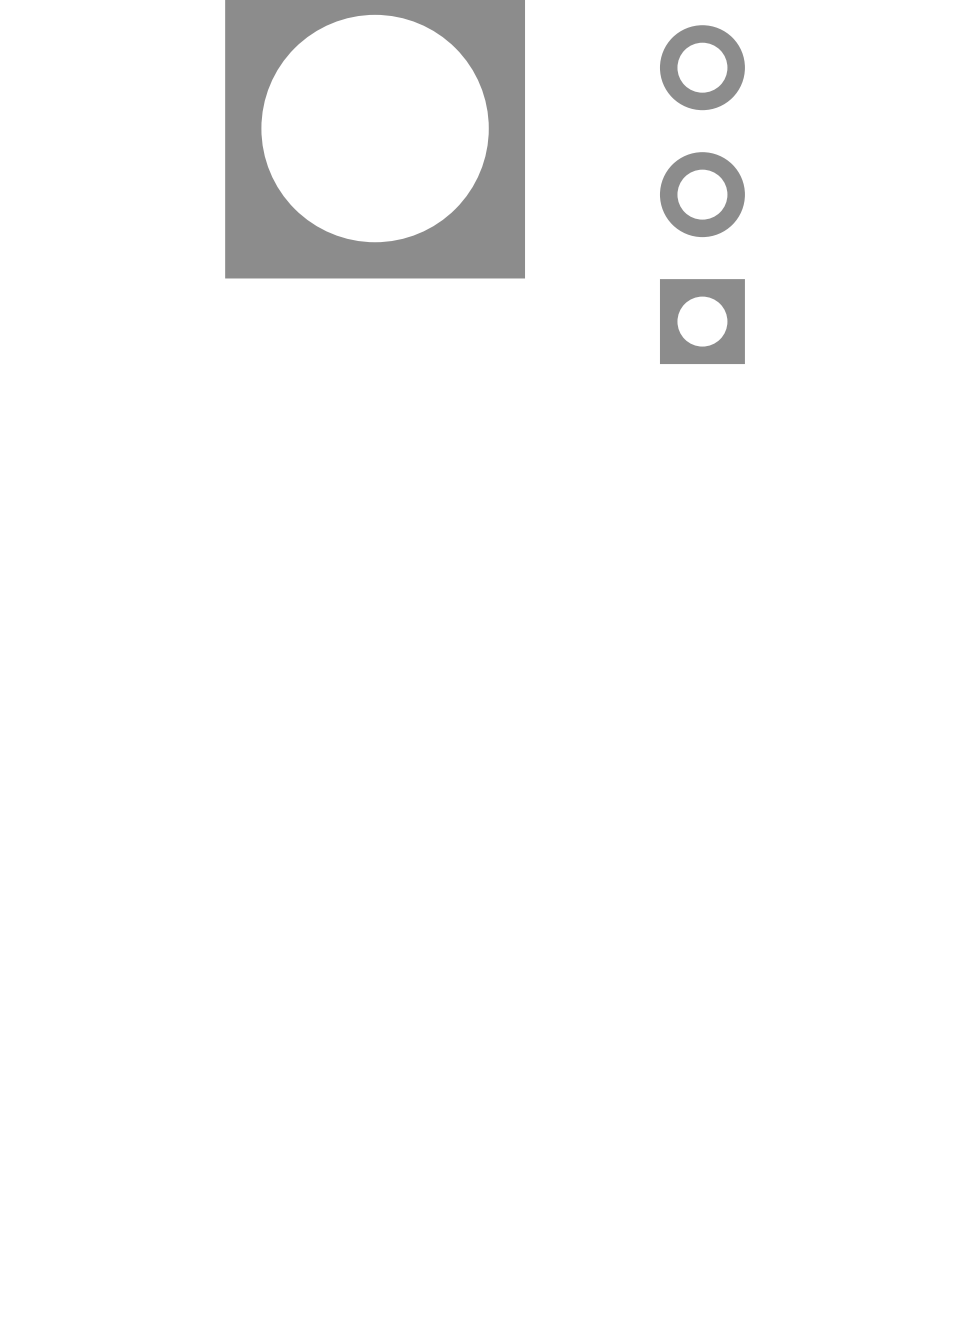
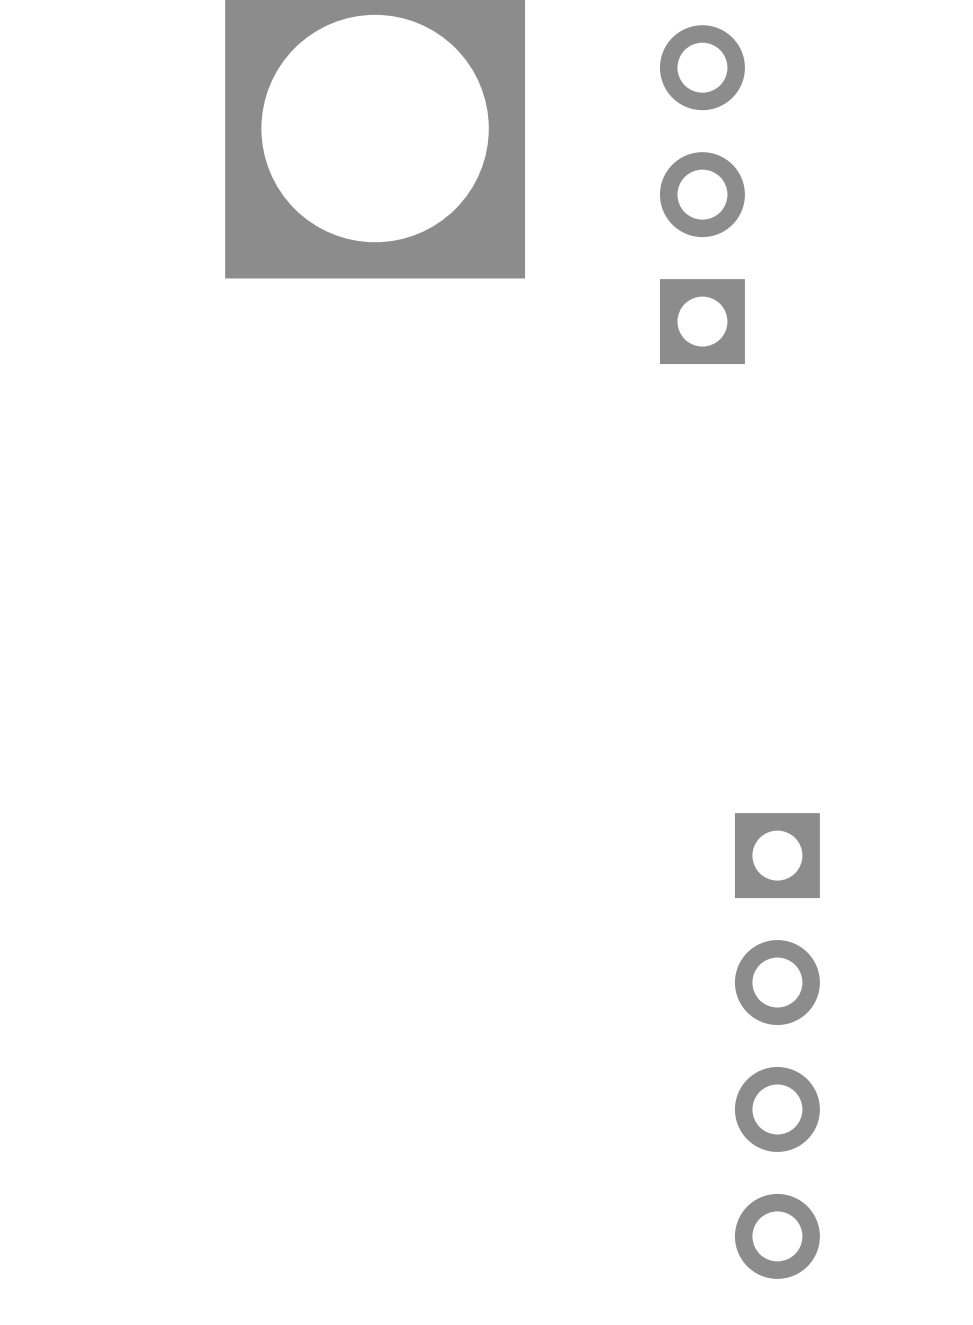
part: none -> (777, 1046)

